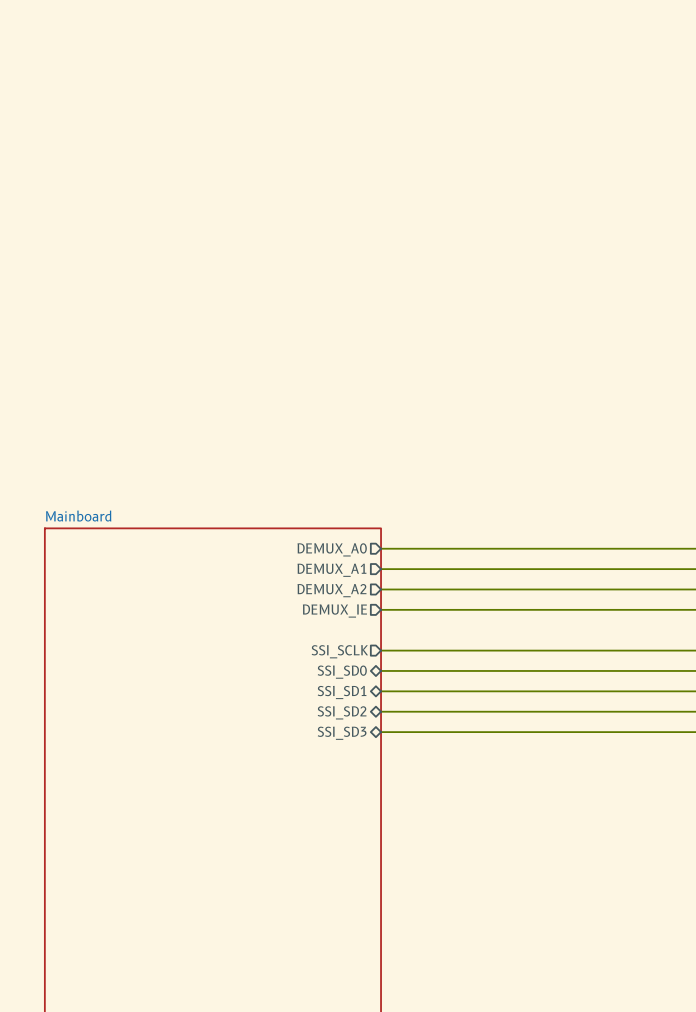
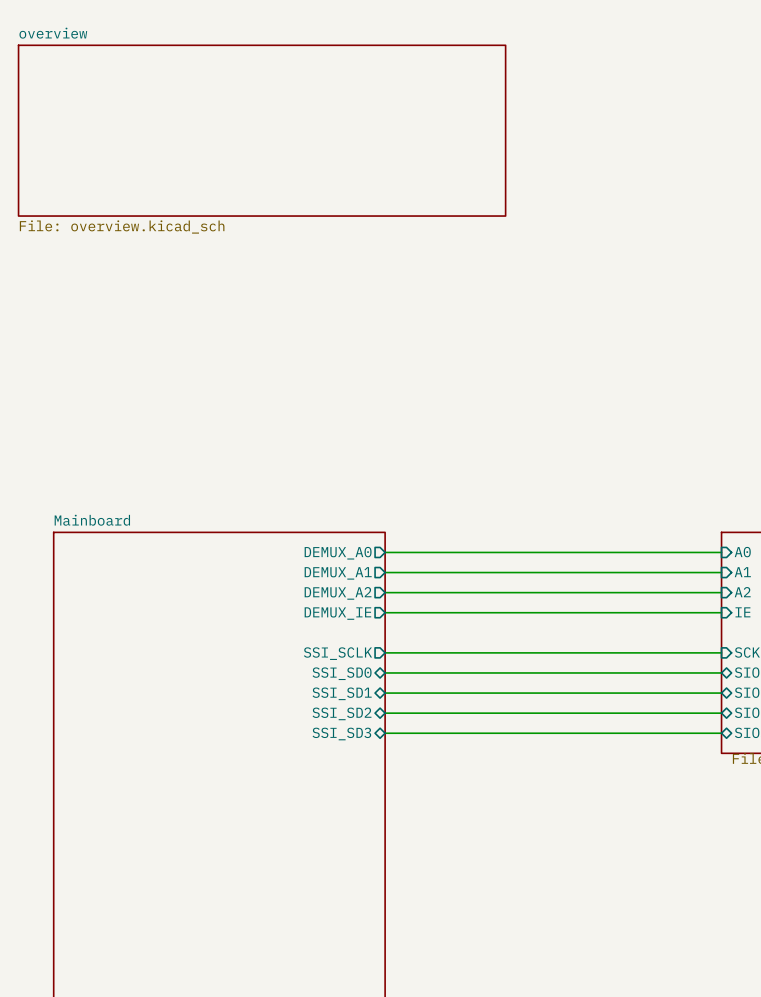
sheet overview: none -> File: overview.kicad_sch (262, 130)

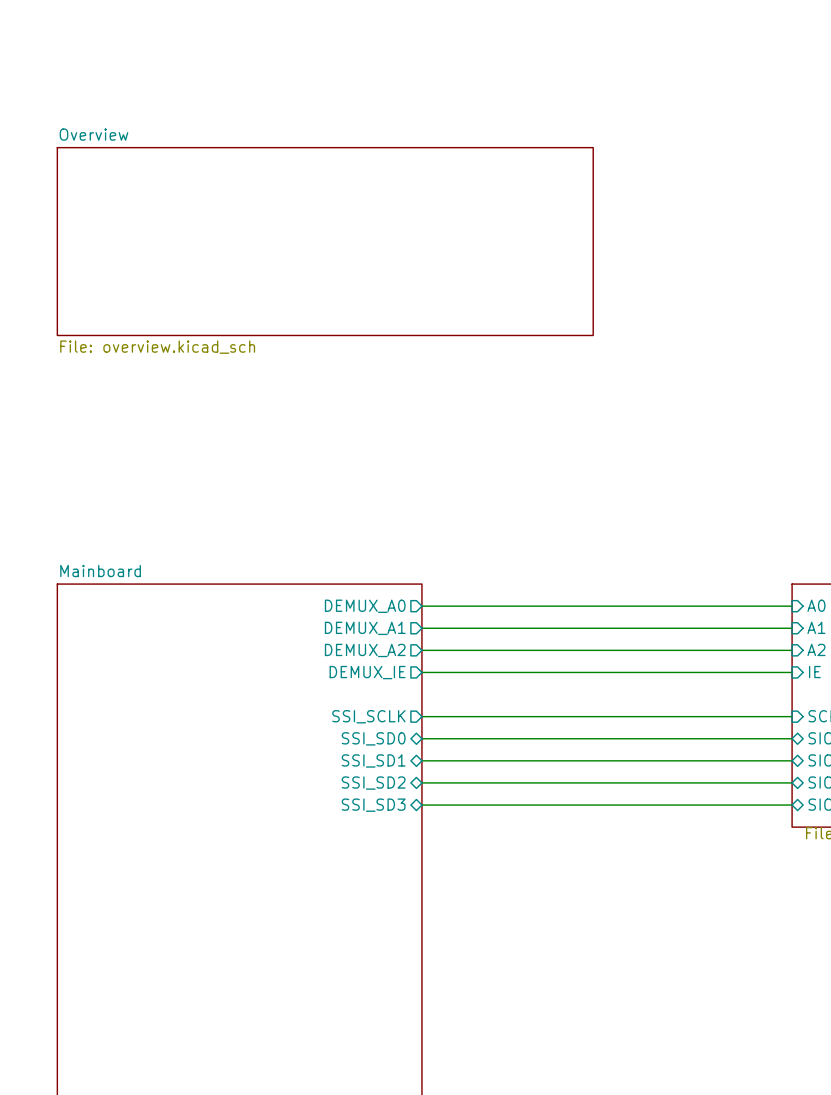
sheet overview: File: overview.kicad_sch (262, 130) -> none
sheet Overview: none -> File: overview.kicad_sch (325, 241)

